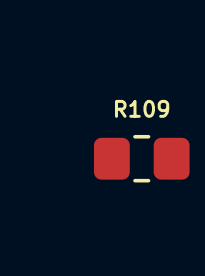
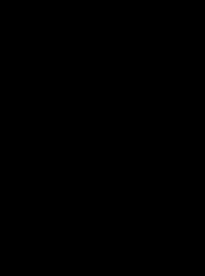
R109: (141, 158) -> none

